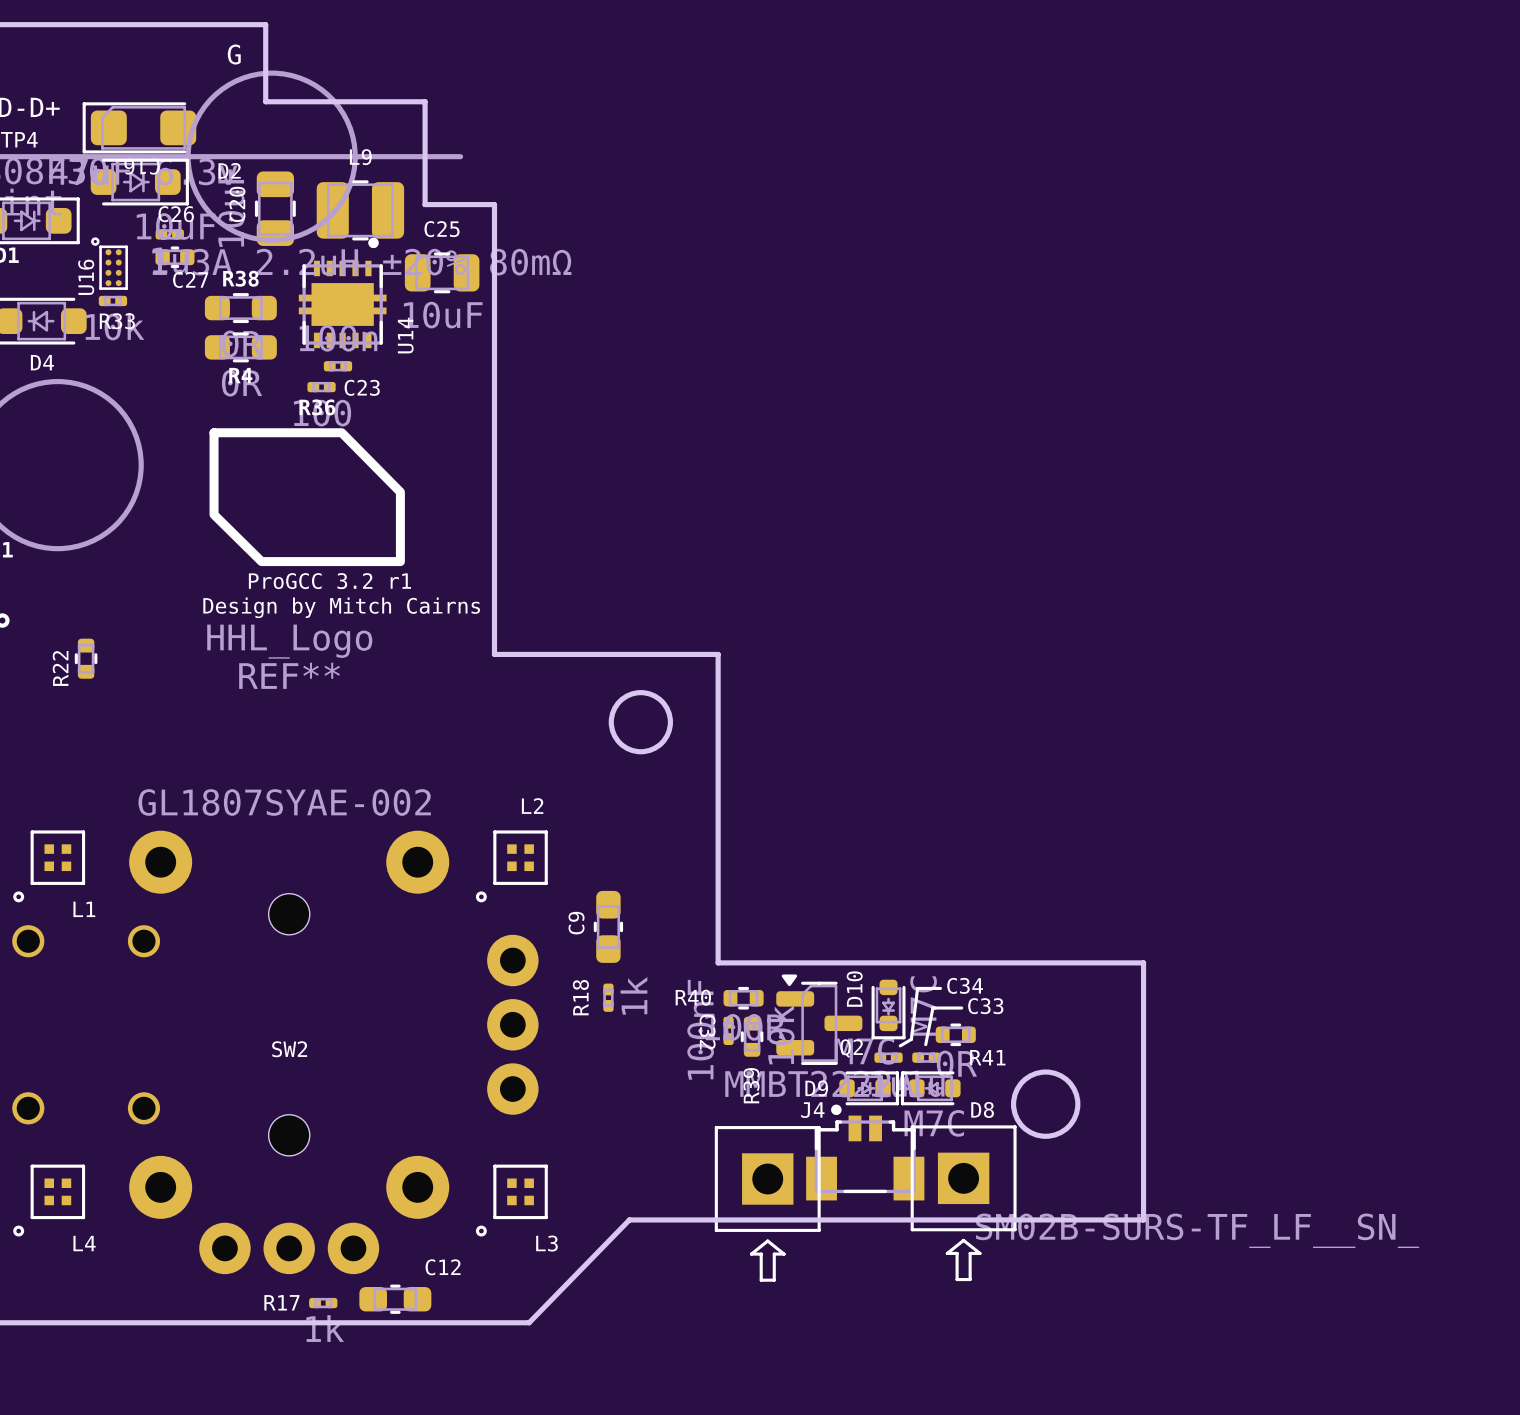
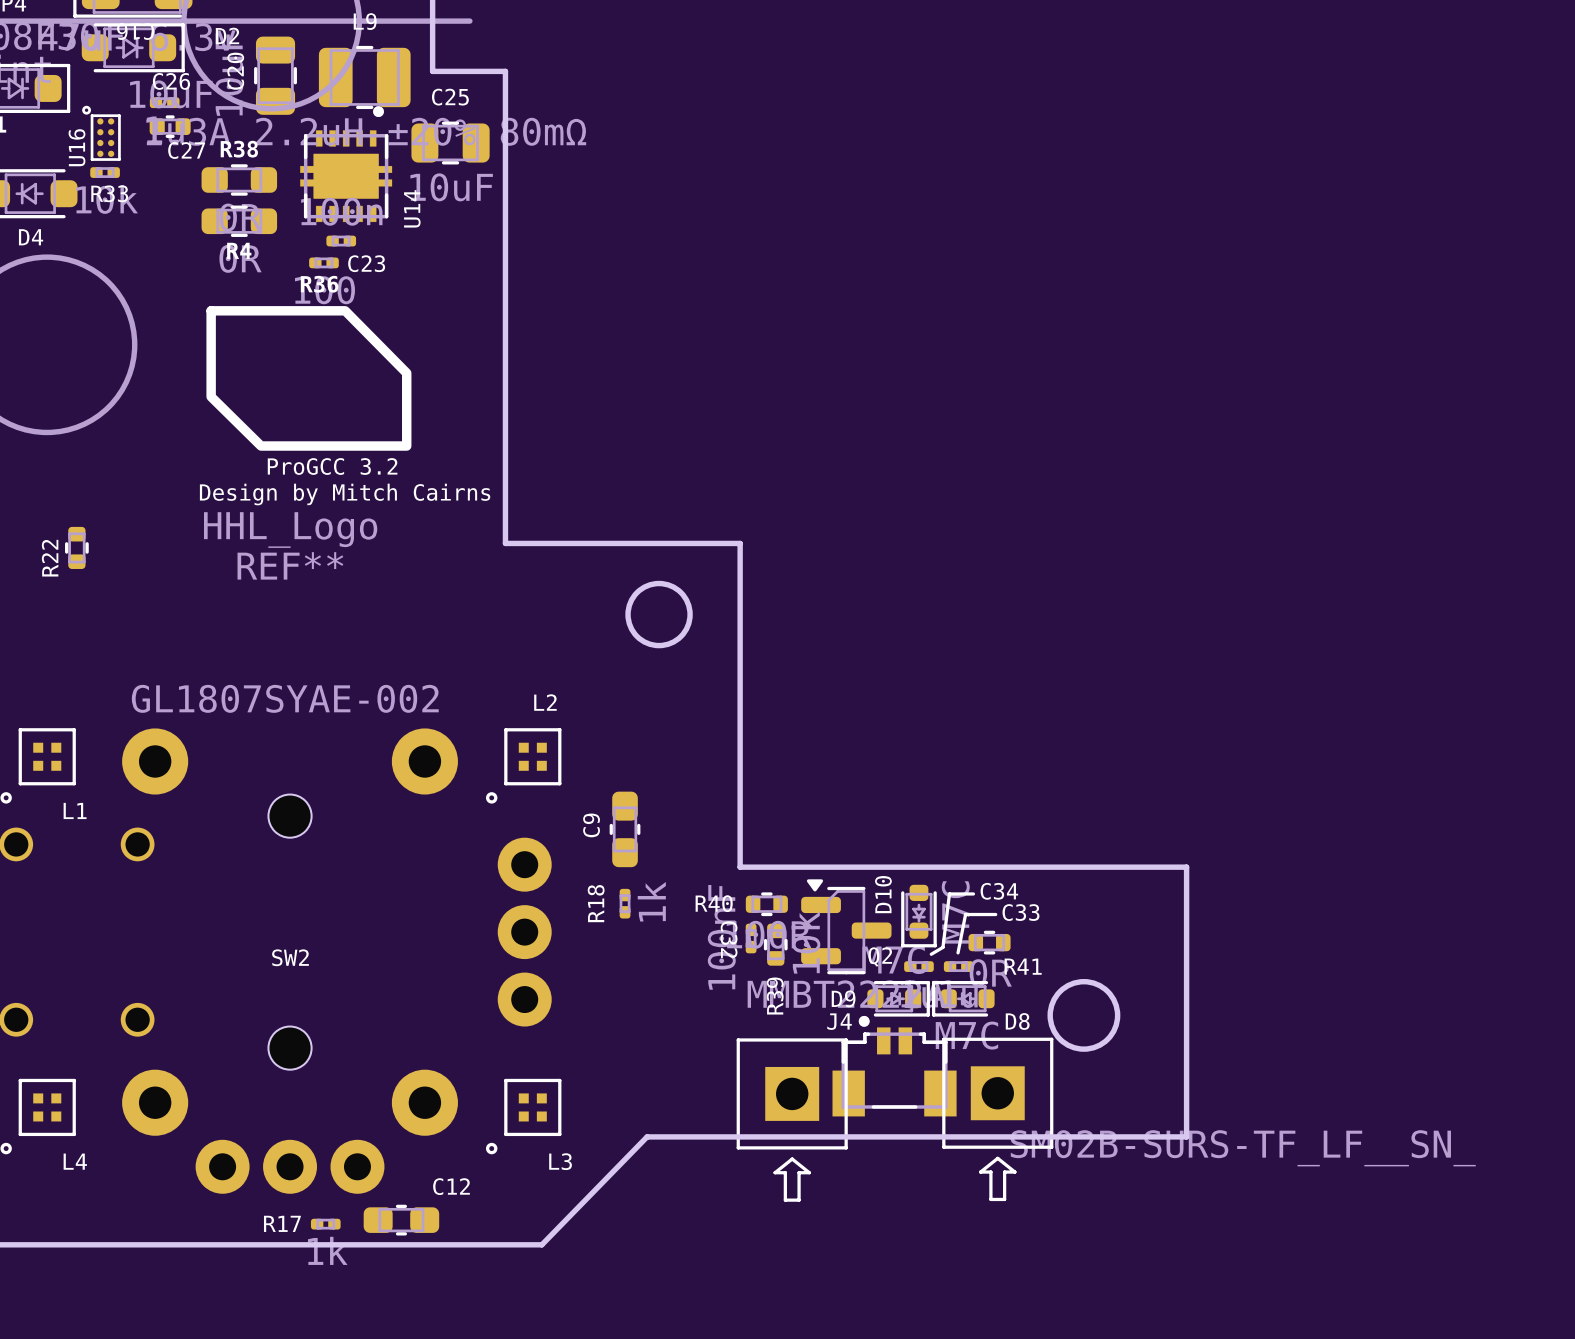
text: ProGCC 3.2 r1 (329, 581) -> ProGCC 3.2 (332, 466)

